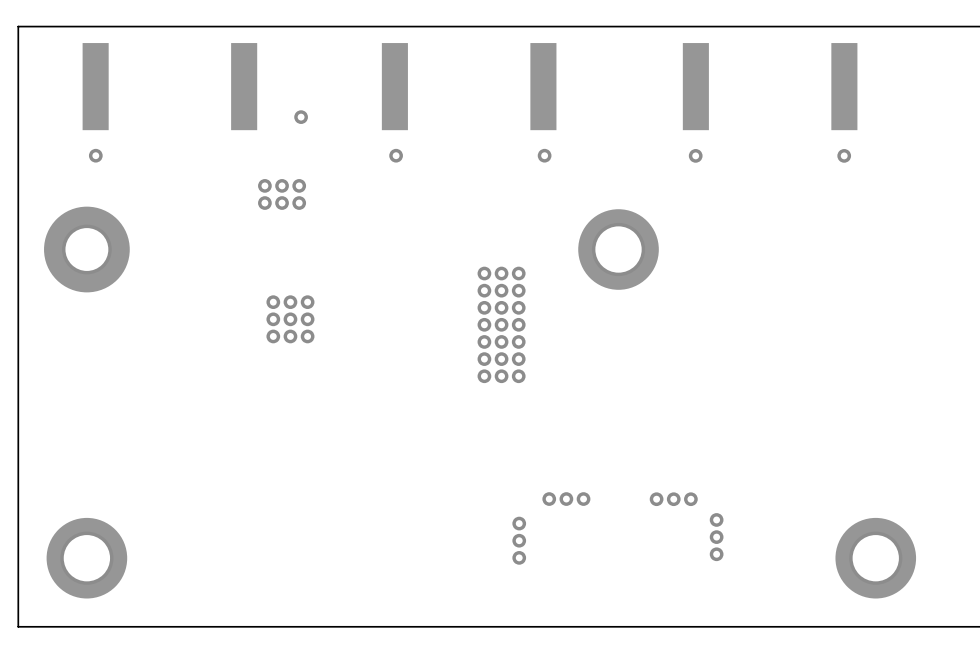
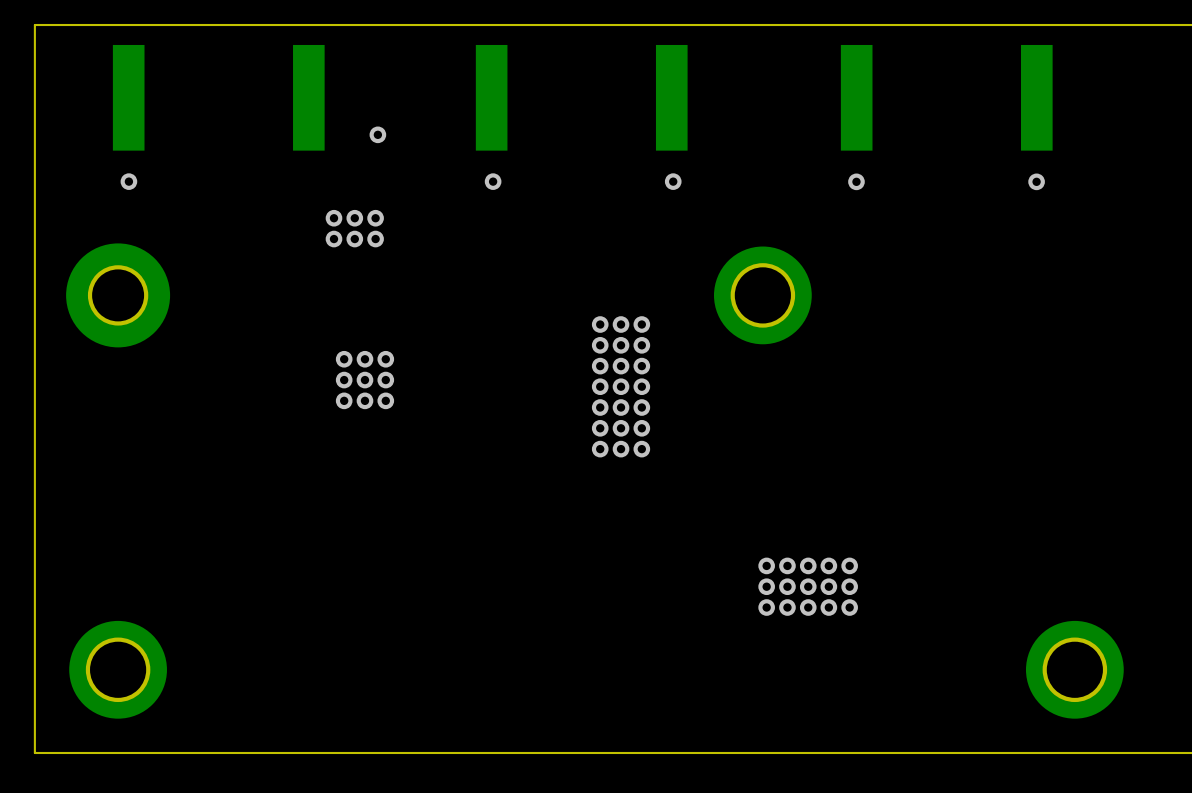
via: none -> (766, 565)
via: none -> (787, 565)
via: none -> (808, 565)
via: none -> (828, 565)
via: none -> (849, 565)
via: none -> (766, 586)
via: none -> (787, 586)
via: none -> (808, 586)
via: none -> (828, 586)
via: none -> (849, 586)
via: (549, 499) -> none
via: (566, 499) -> none
via: (583, 499) -> none
via: (656, 499) -> none
via: (673, 499) -> none
via: (690, 499) -> none
via: none -> (766, 607)
via: none -> (787, 607)
via: none -> (808, 607)
via: none -> (828, 607)
via: none -> (849, 607)
via: (716, 519) -> none
via: (519, 523) -> none
via: (716, 537) -> none
via: (519, 540) -> none
via: (716, 554) -> none
via: (519, 557) -> none

